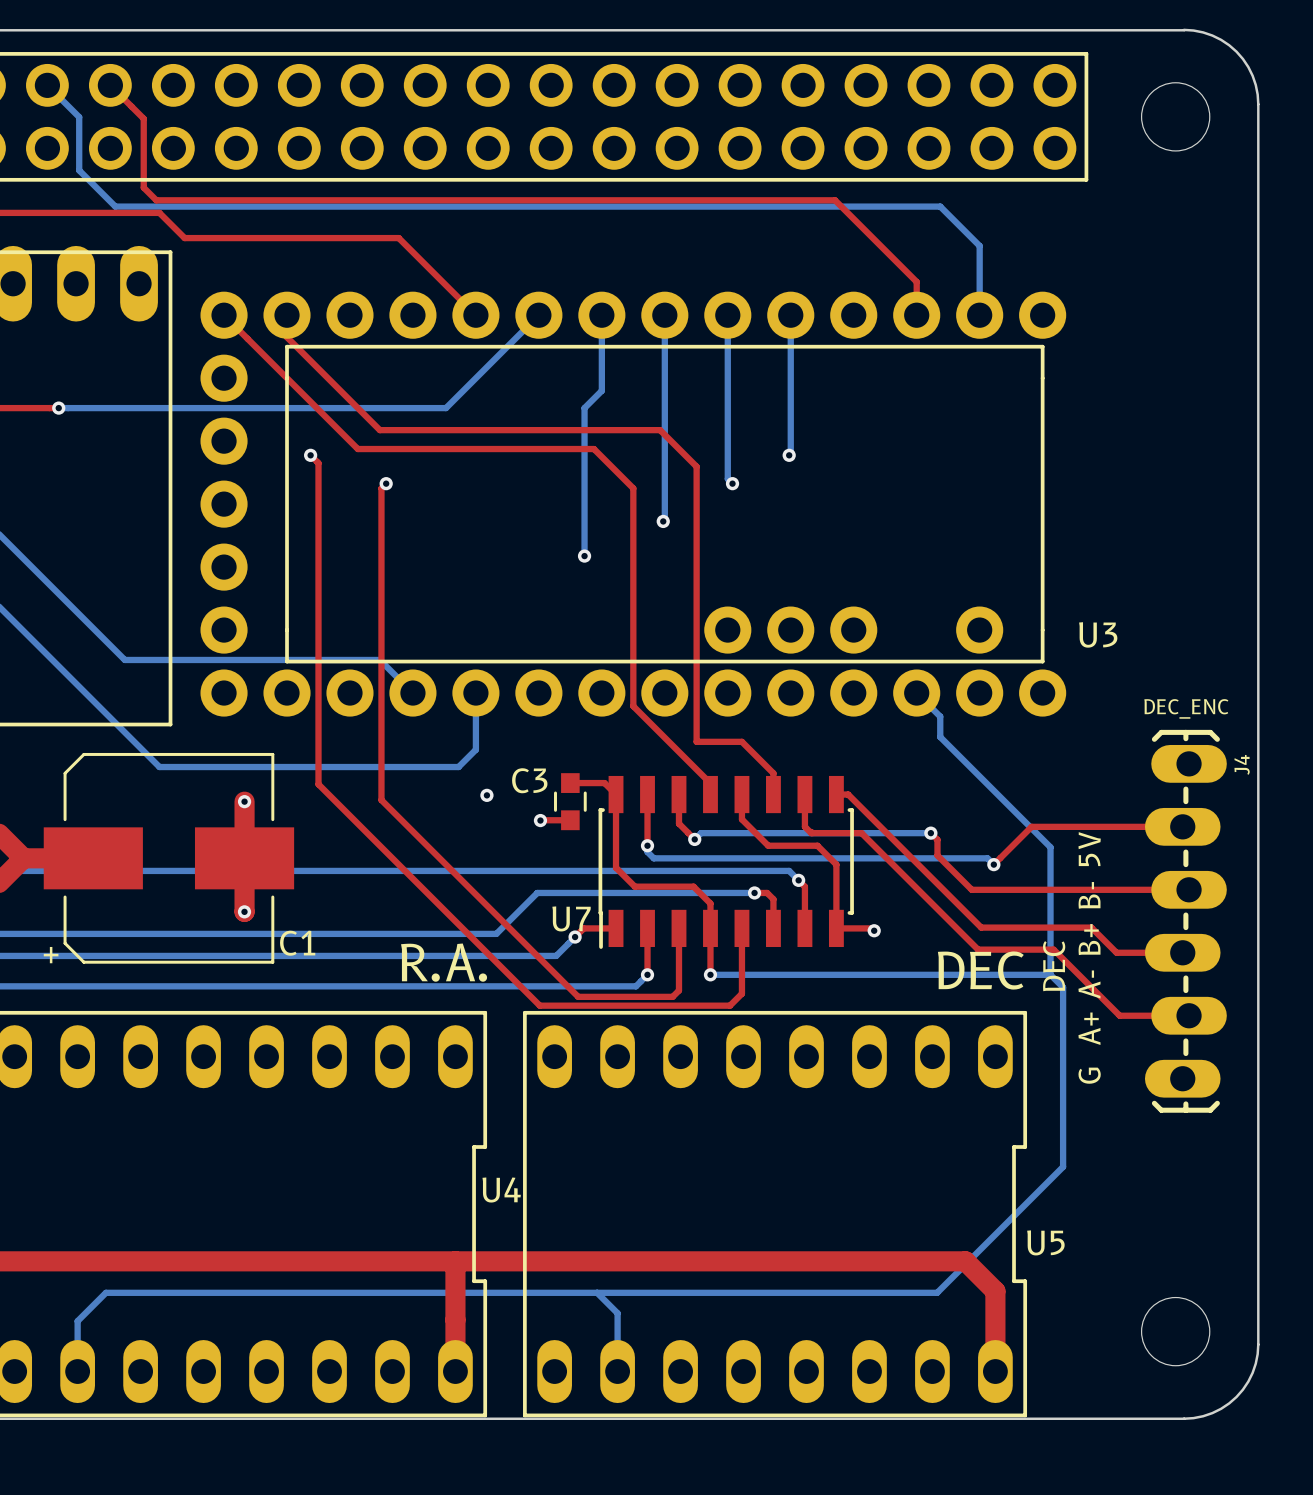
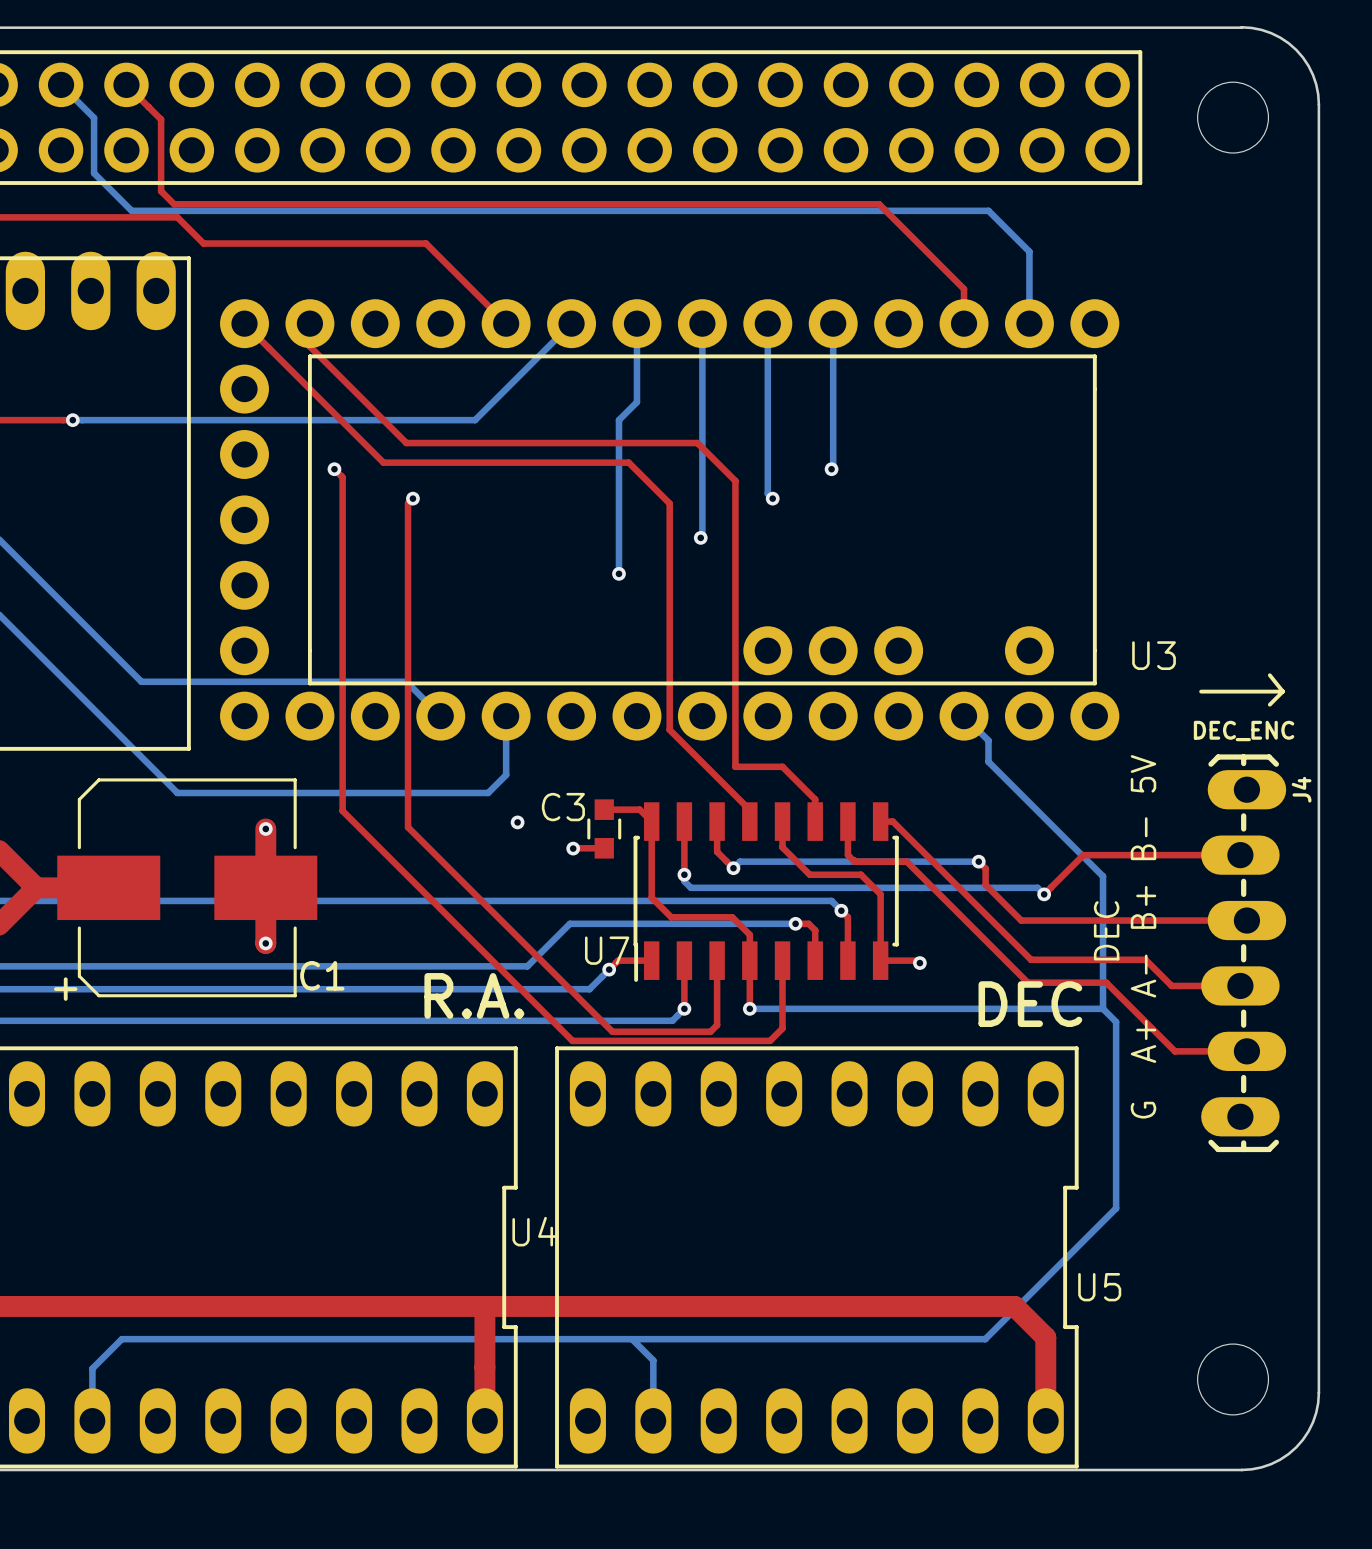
line: none -> (1269, 675) (1282, 691)
line: none -> (1201, 691) (1282, 691)
line: none -> (1282, 691) (1269, 704)

